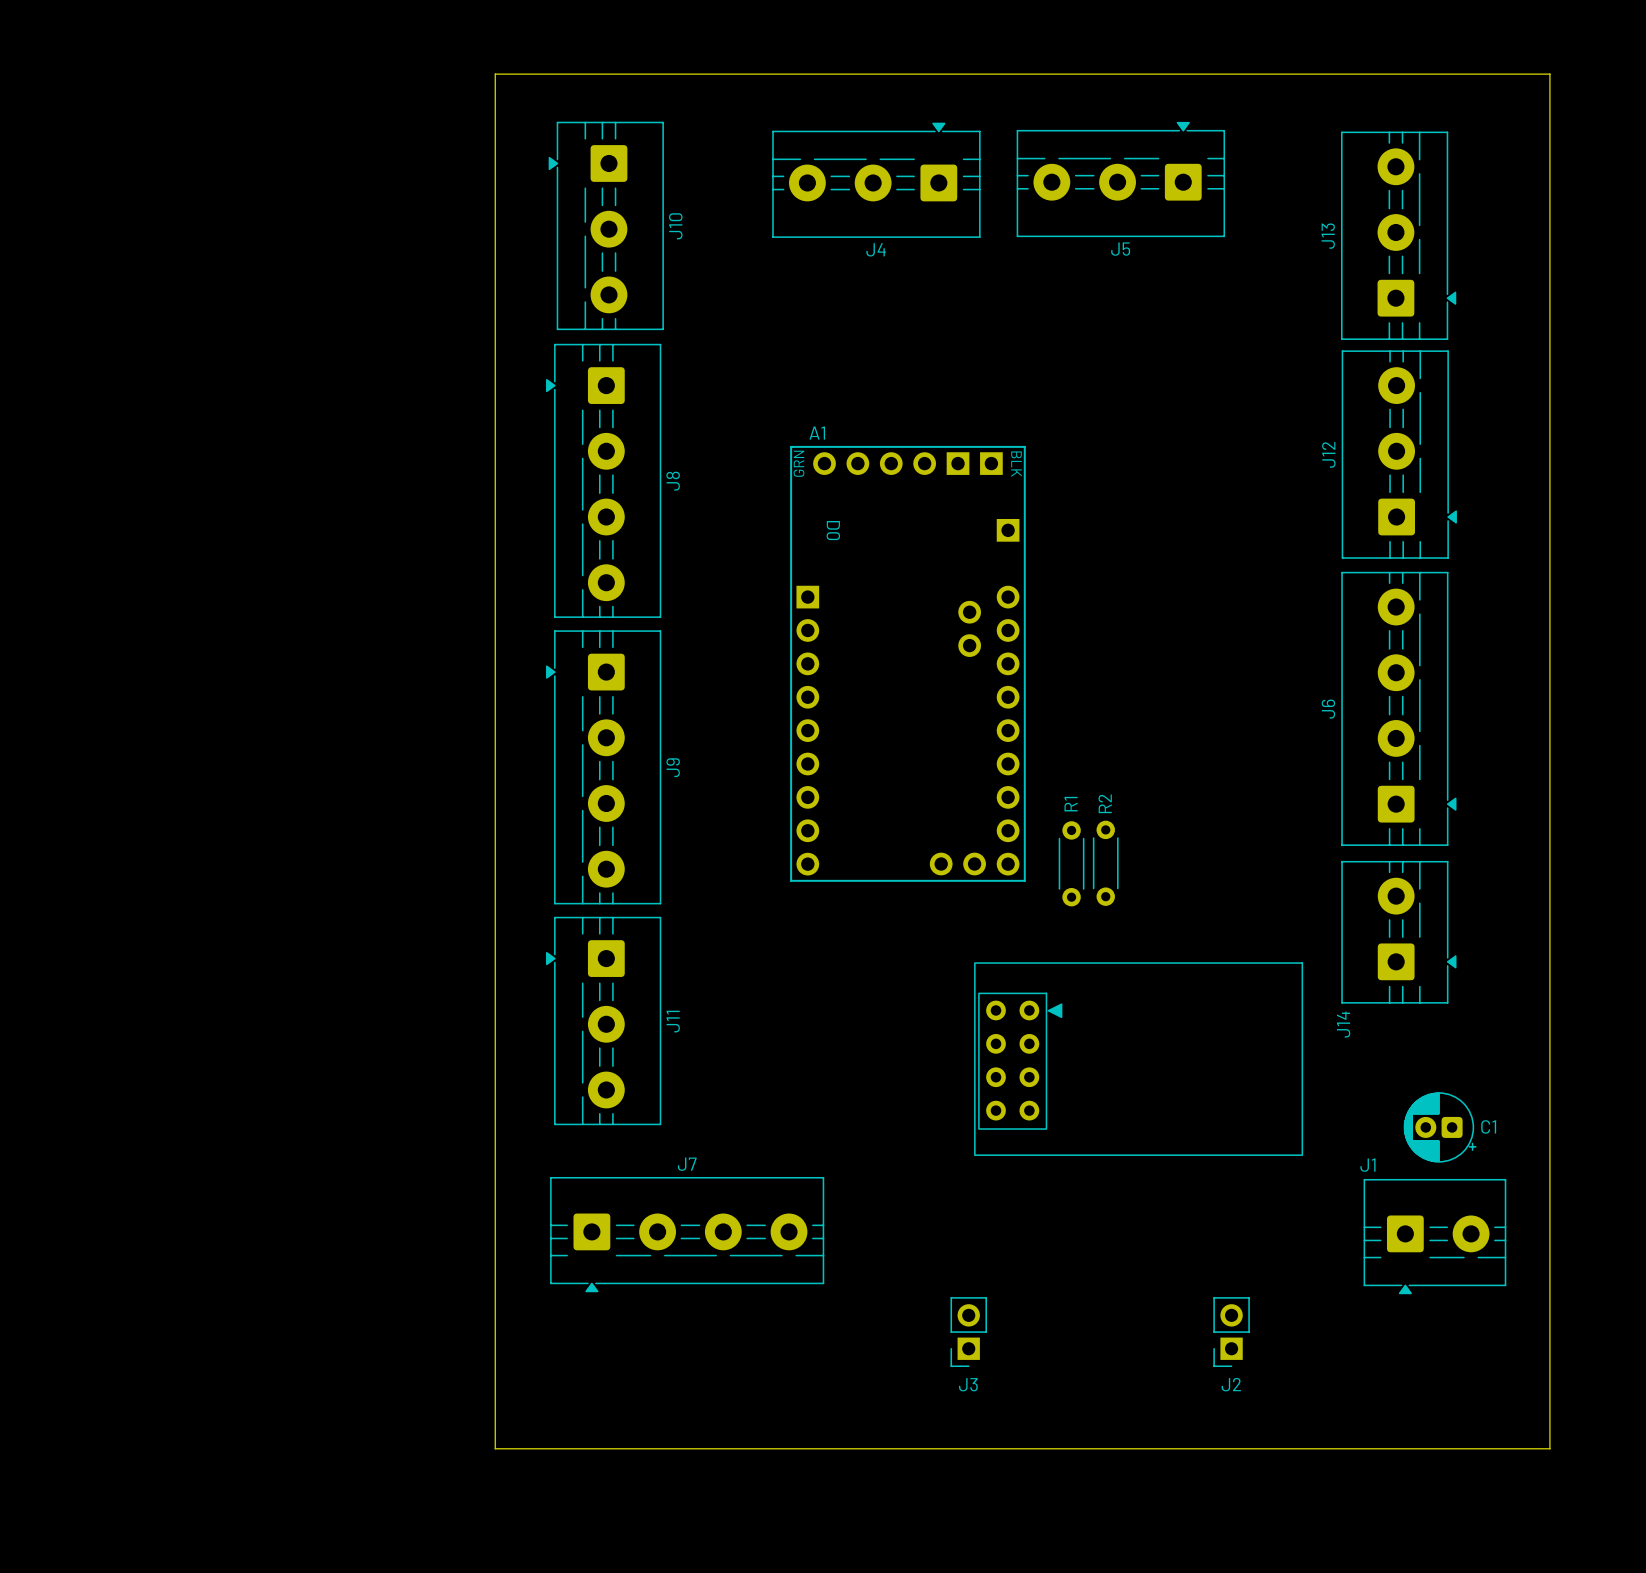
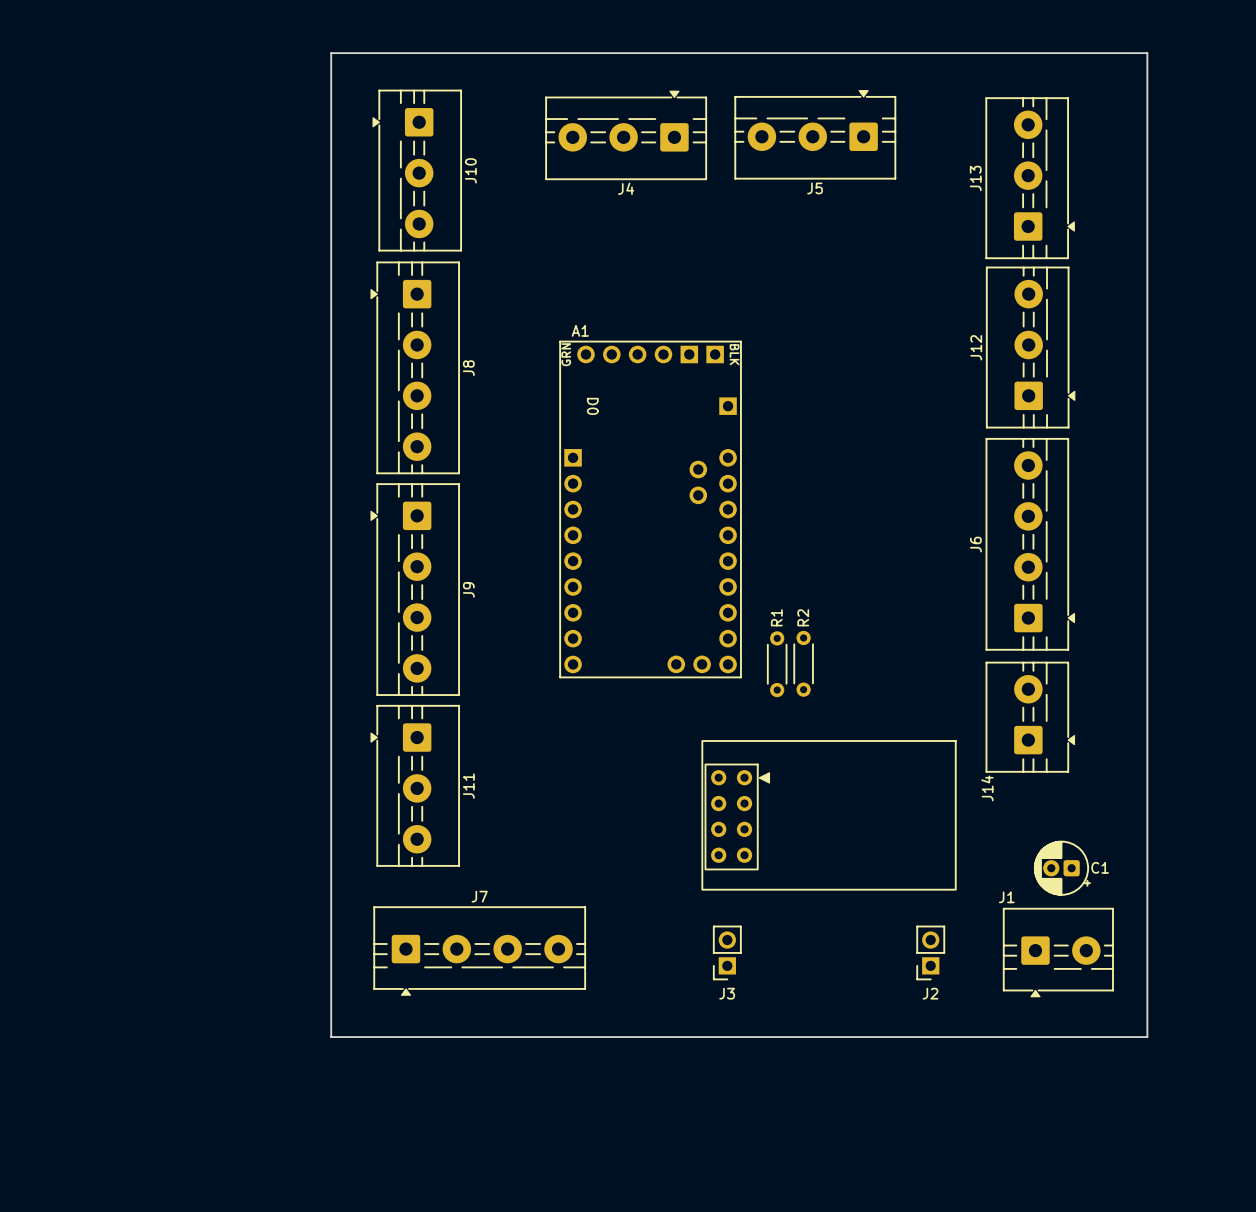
J3 position: (968, 1332) -> (727, 952)
J2 position: (1231, 1332) -> (930, 952)
board edge: (495, 1345) (495, 1448) (1549, 1448) (1549, 1345) -> (331, 1037) (1147, 1037)

